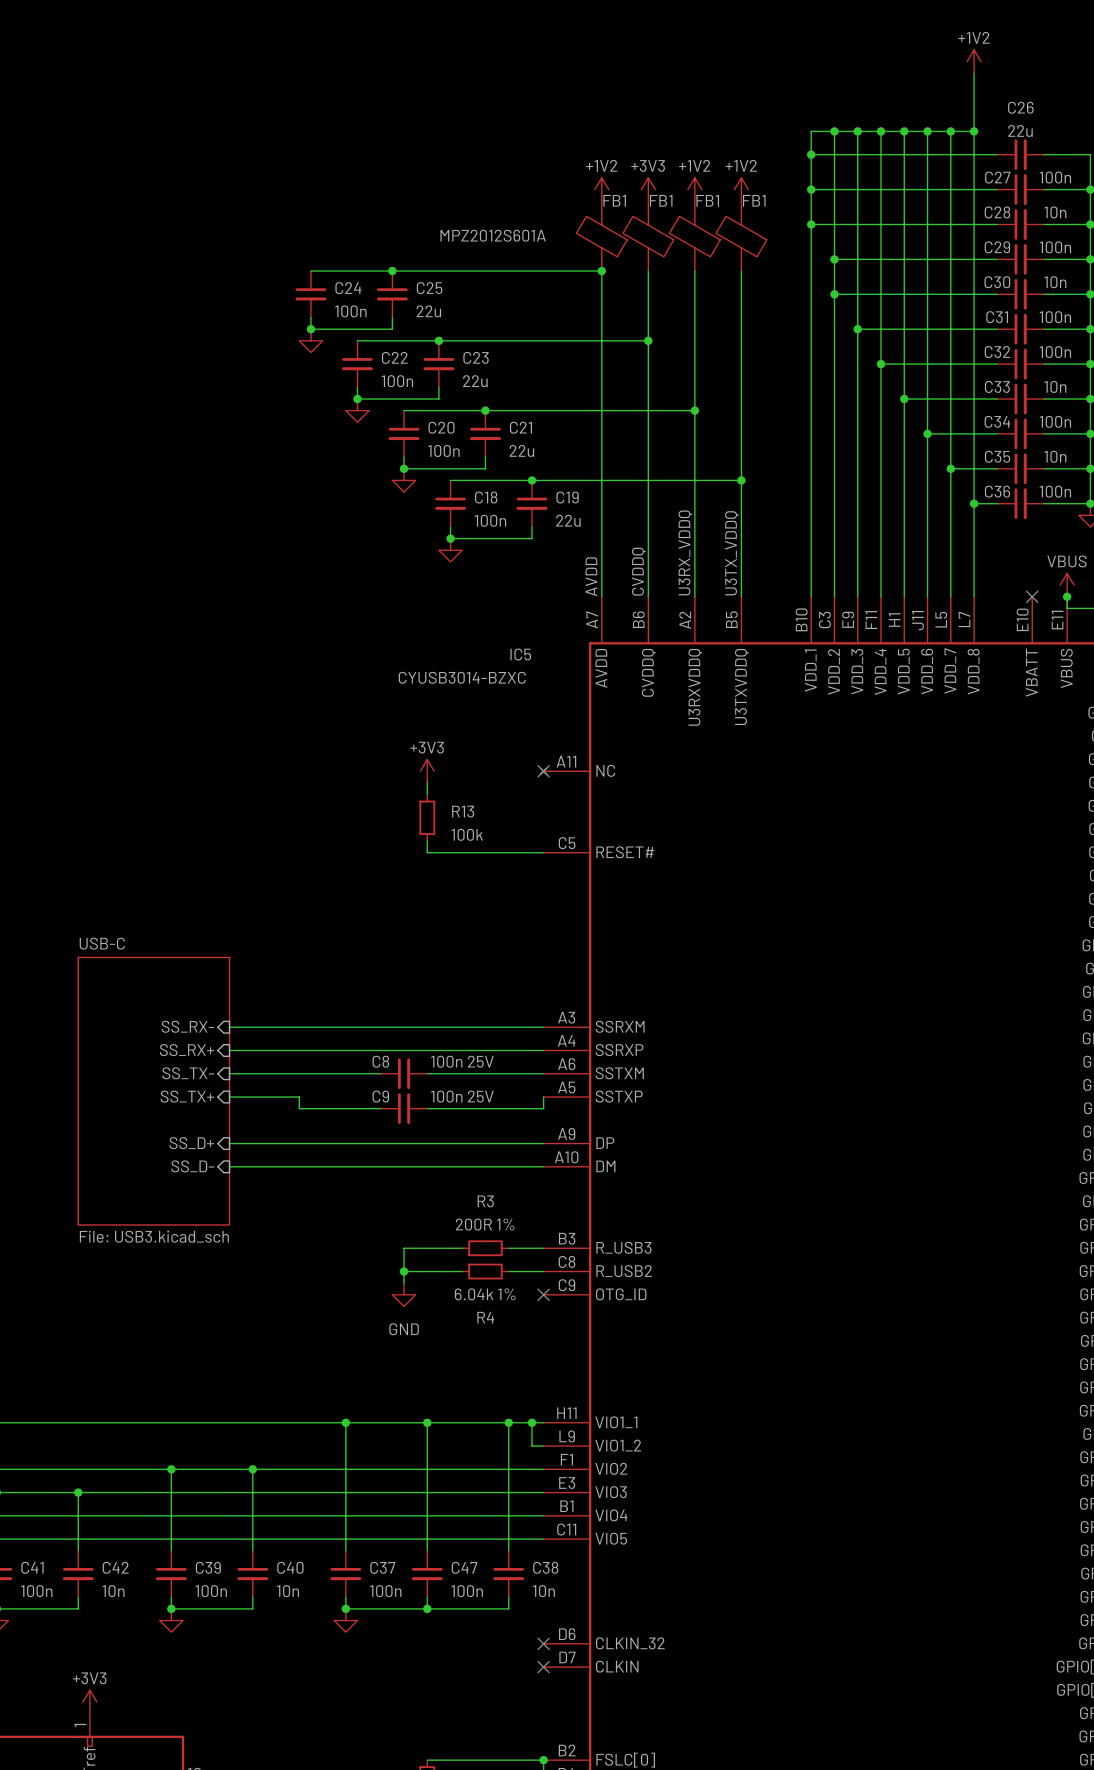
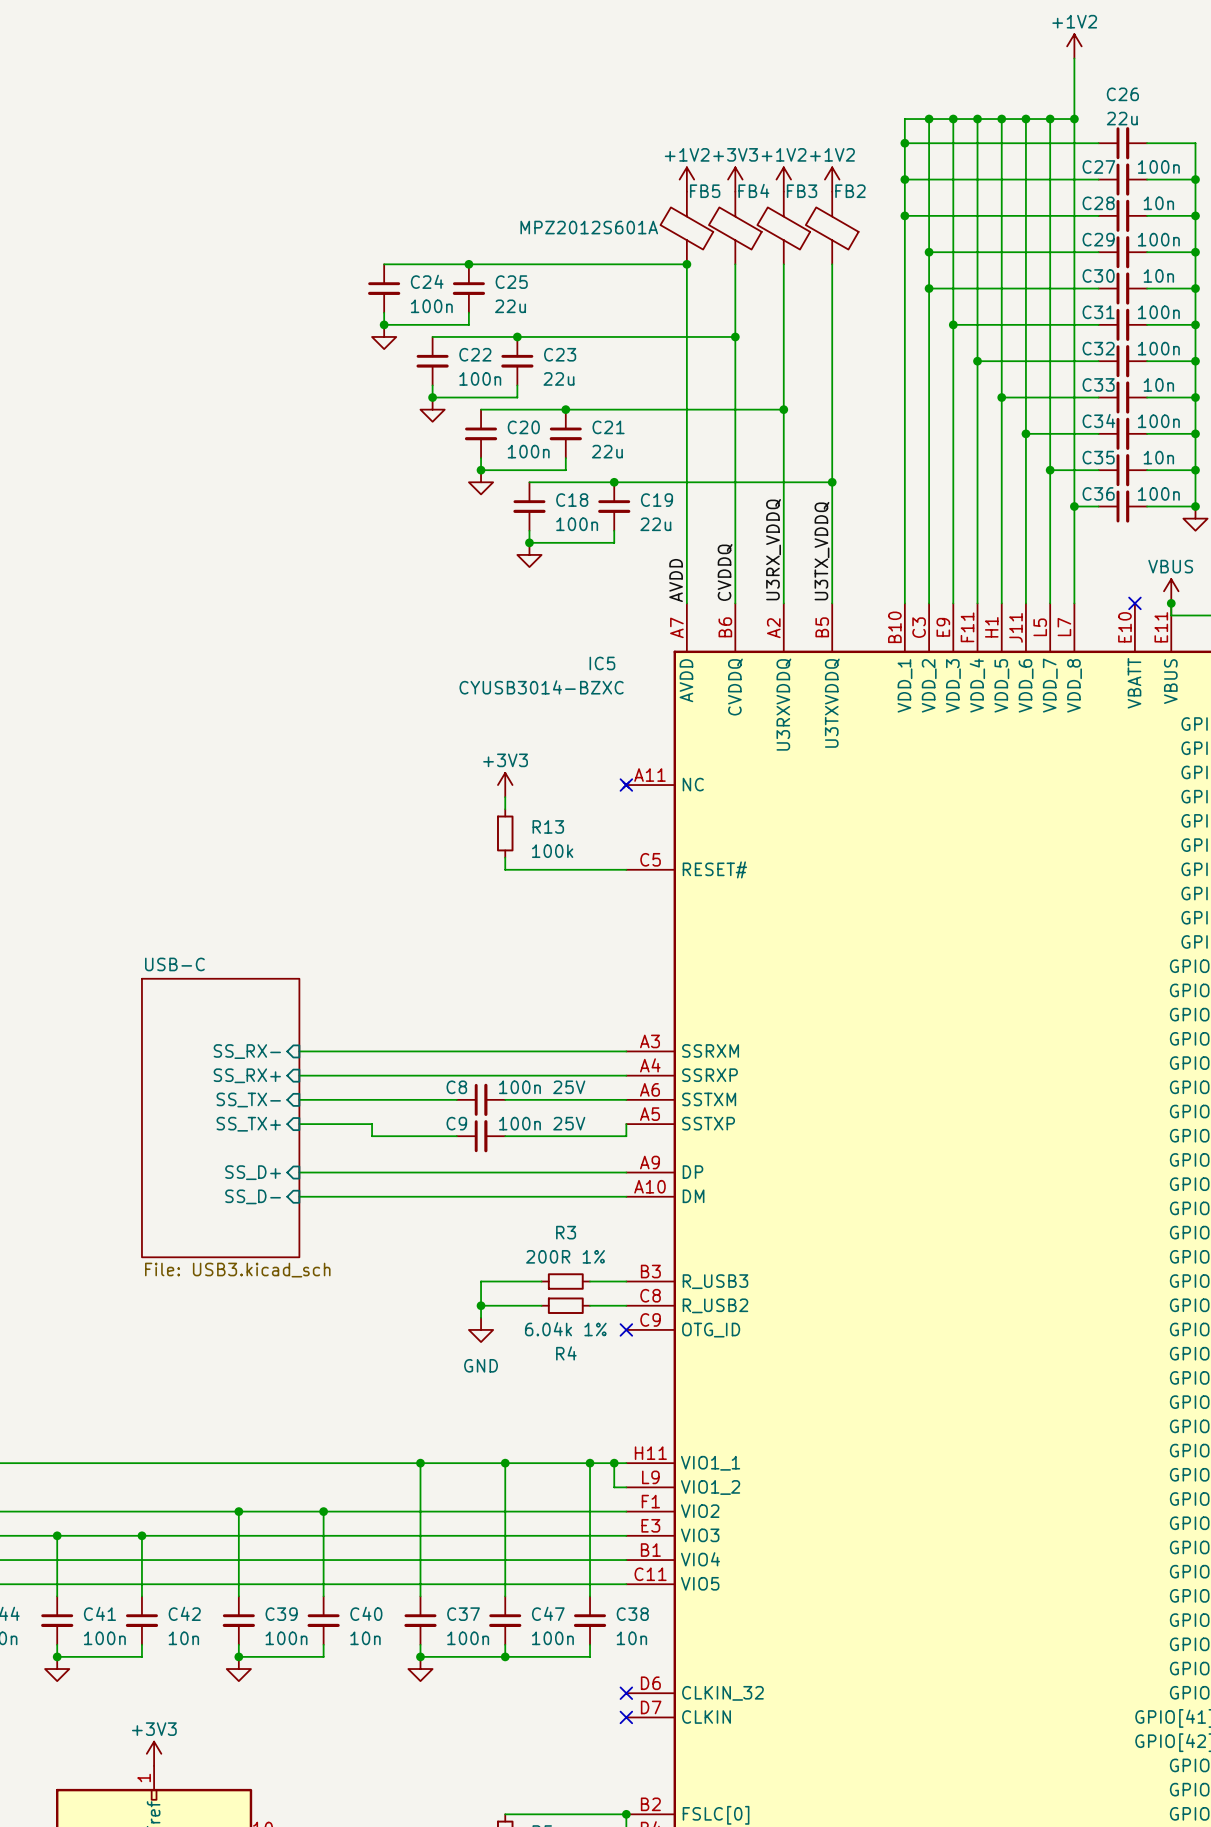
FB1 name: FB1 (614, 200) -> FB5 (705, 191)
FB1 name: FB1 (661, 200) -> FB4 (753, 190)
FB1 name: FB1 (707, 200) -> FB3 (802, 191)
FB1 name: FB1 (754, 200) -> FB2 (850, 191)

